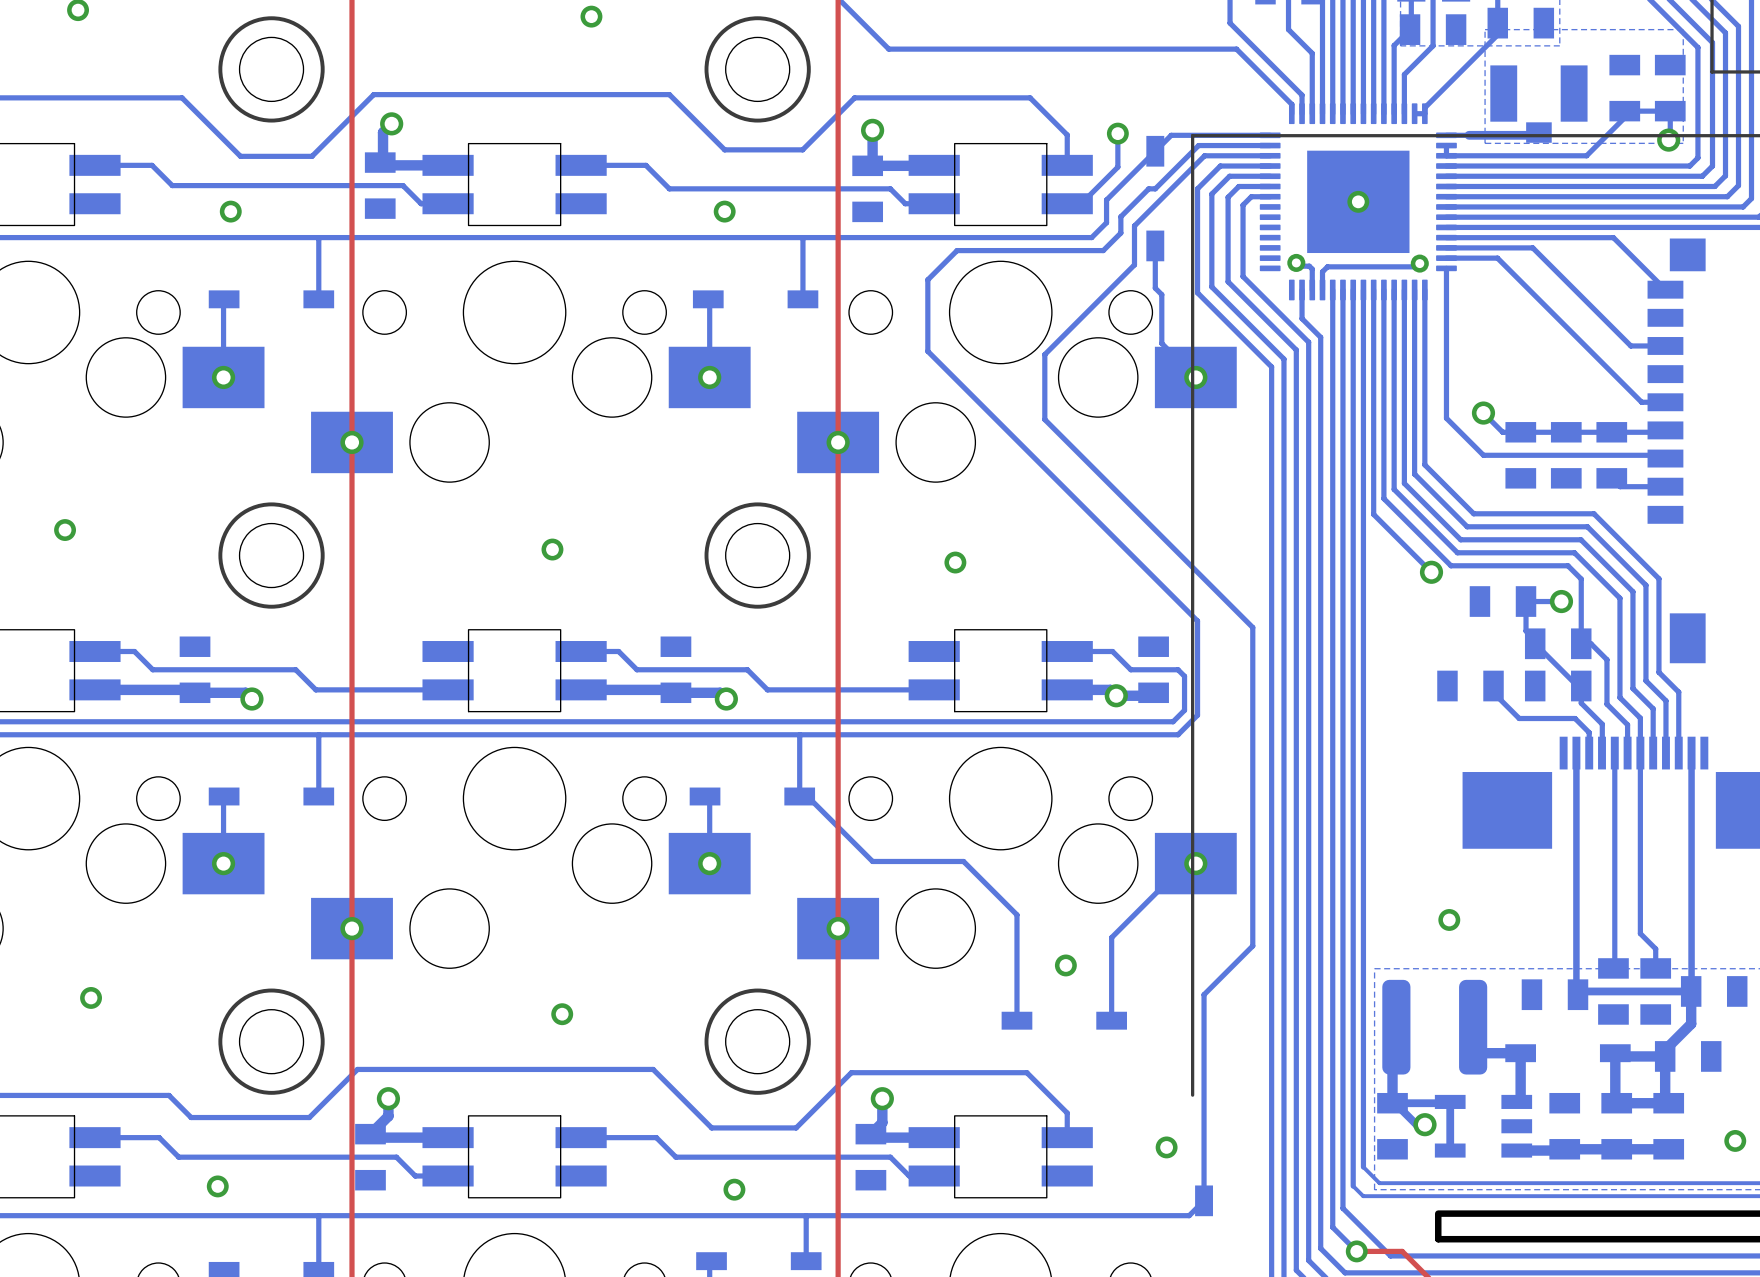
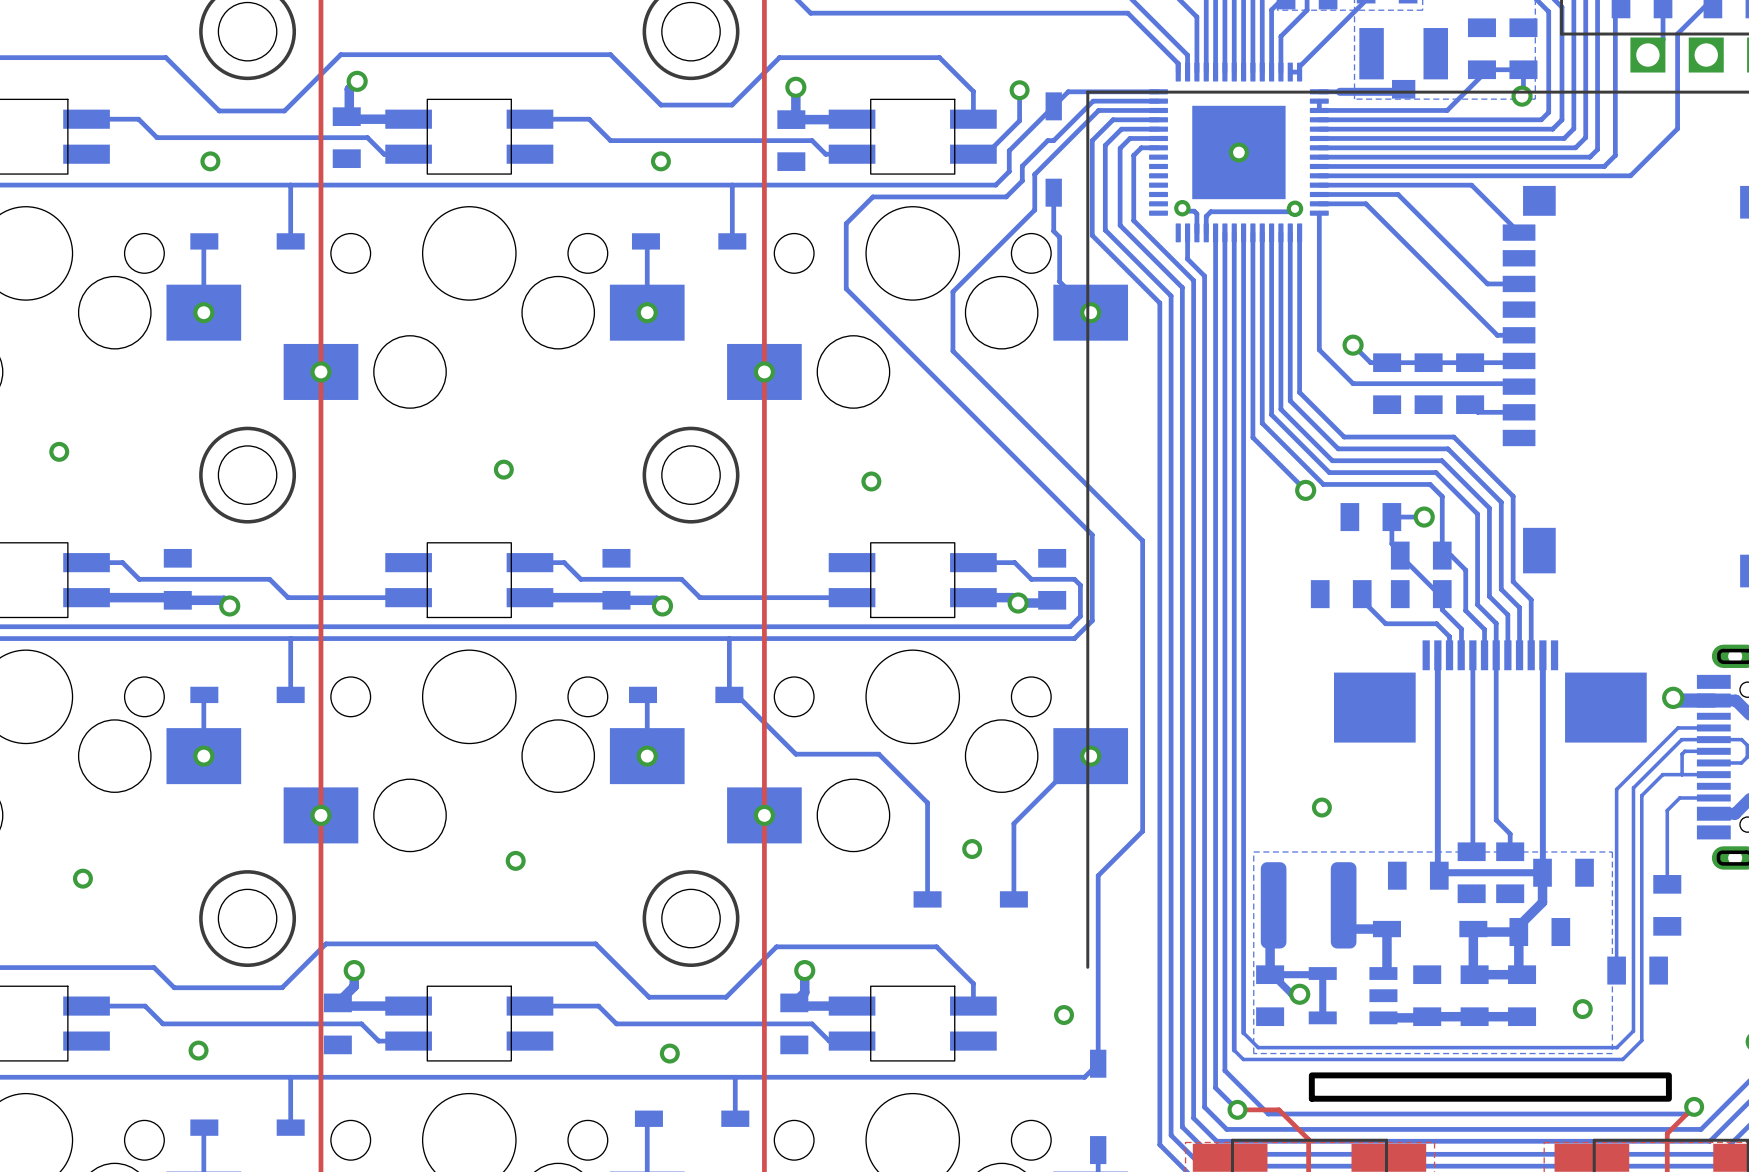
via position: (562, 1014) -> (515, 860)

